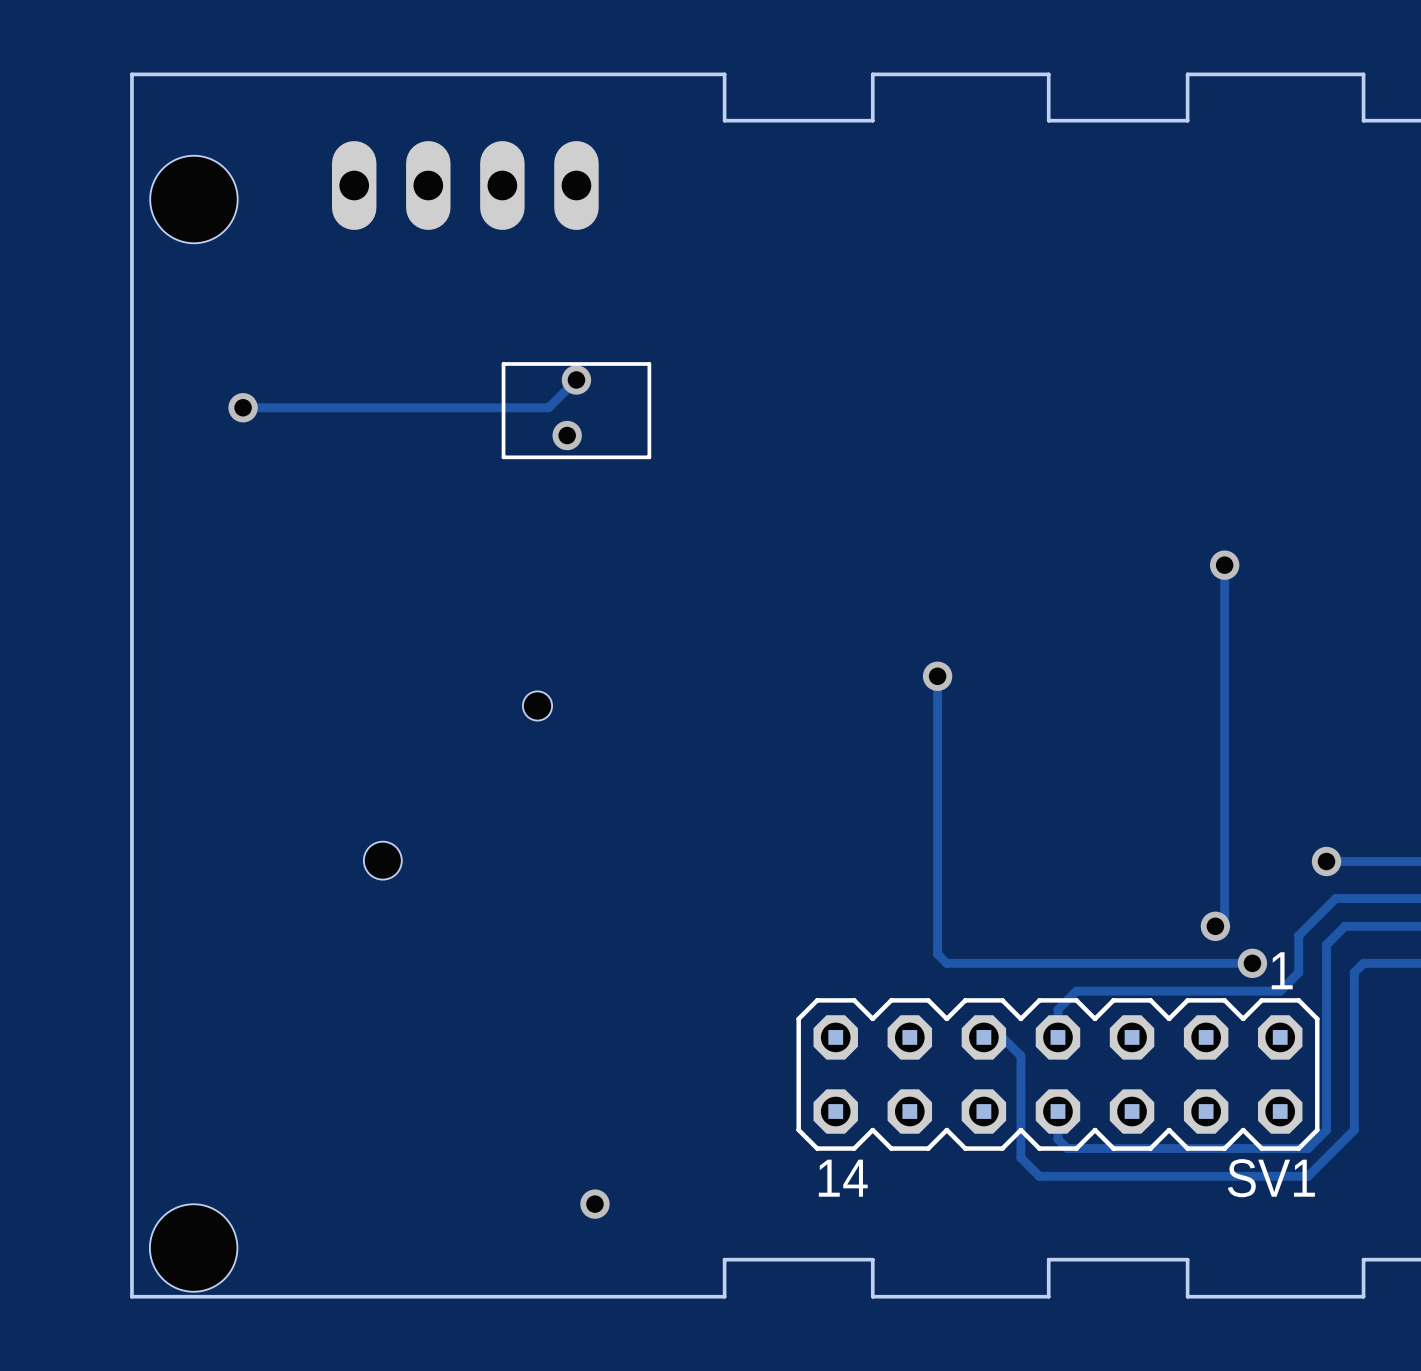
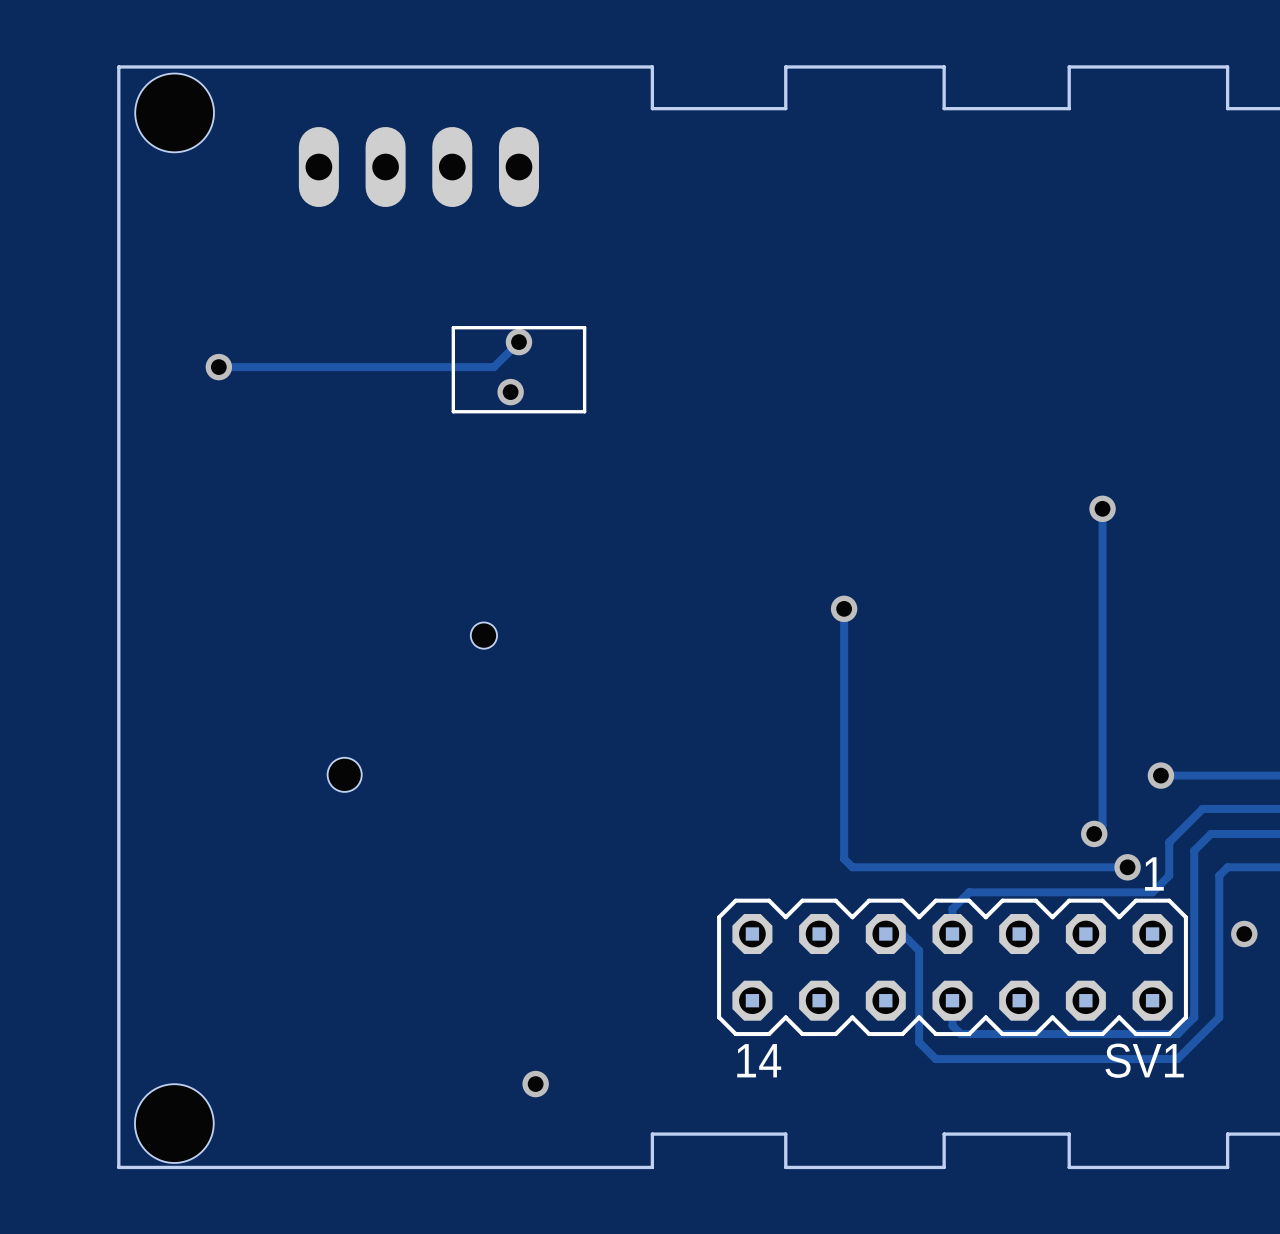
hole position: (193, 199) -> (174, 112)
track: none -> (1194, 775) (1160, 775)
via position: (1326, 861) -> (1160, 775)
via: none -> (1244, 934)

